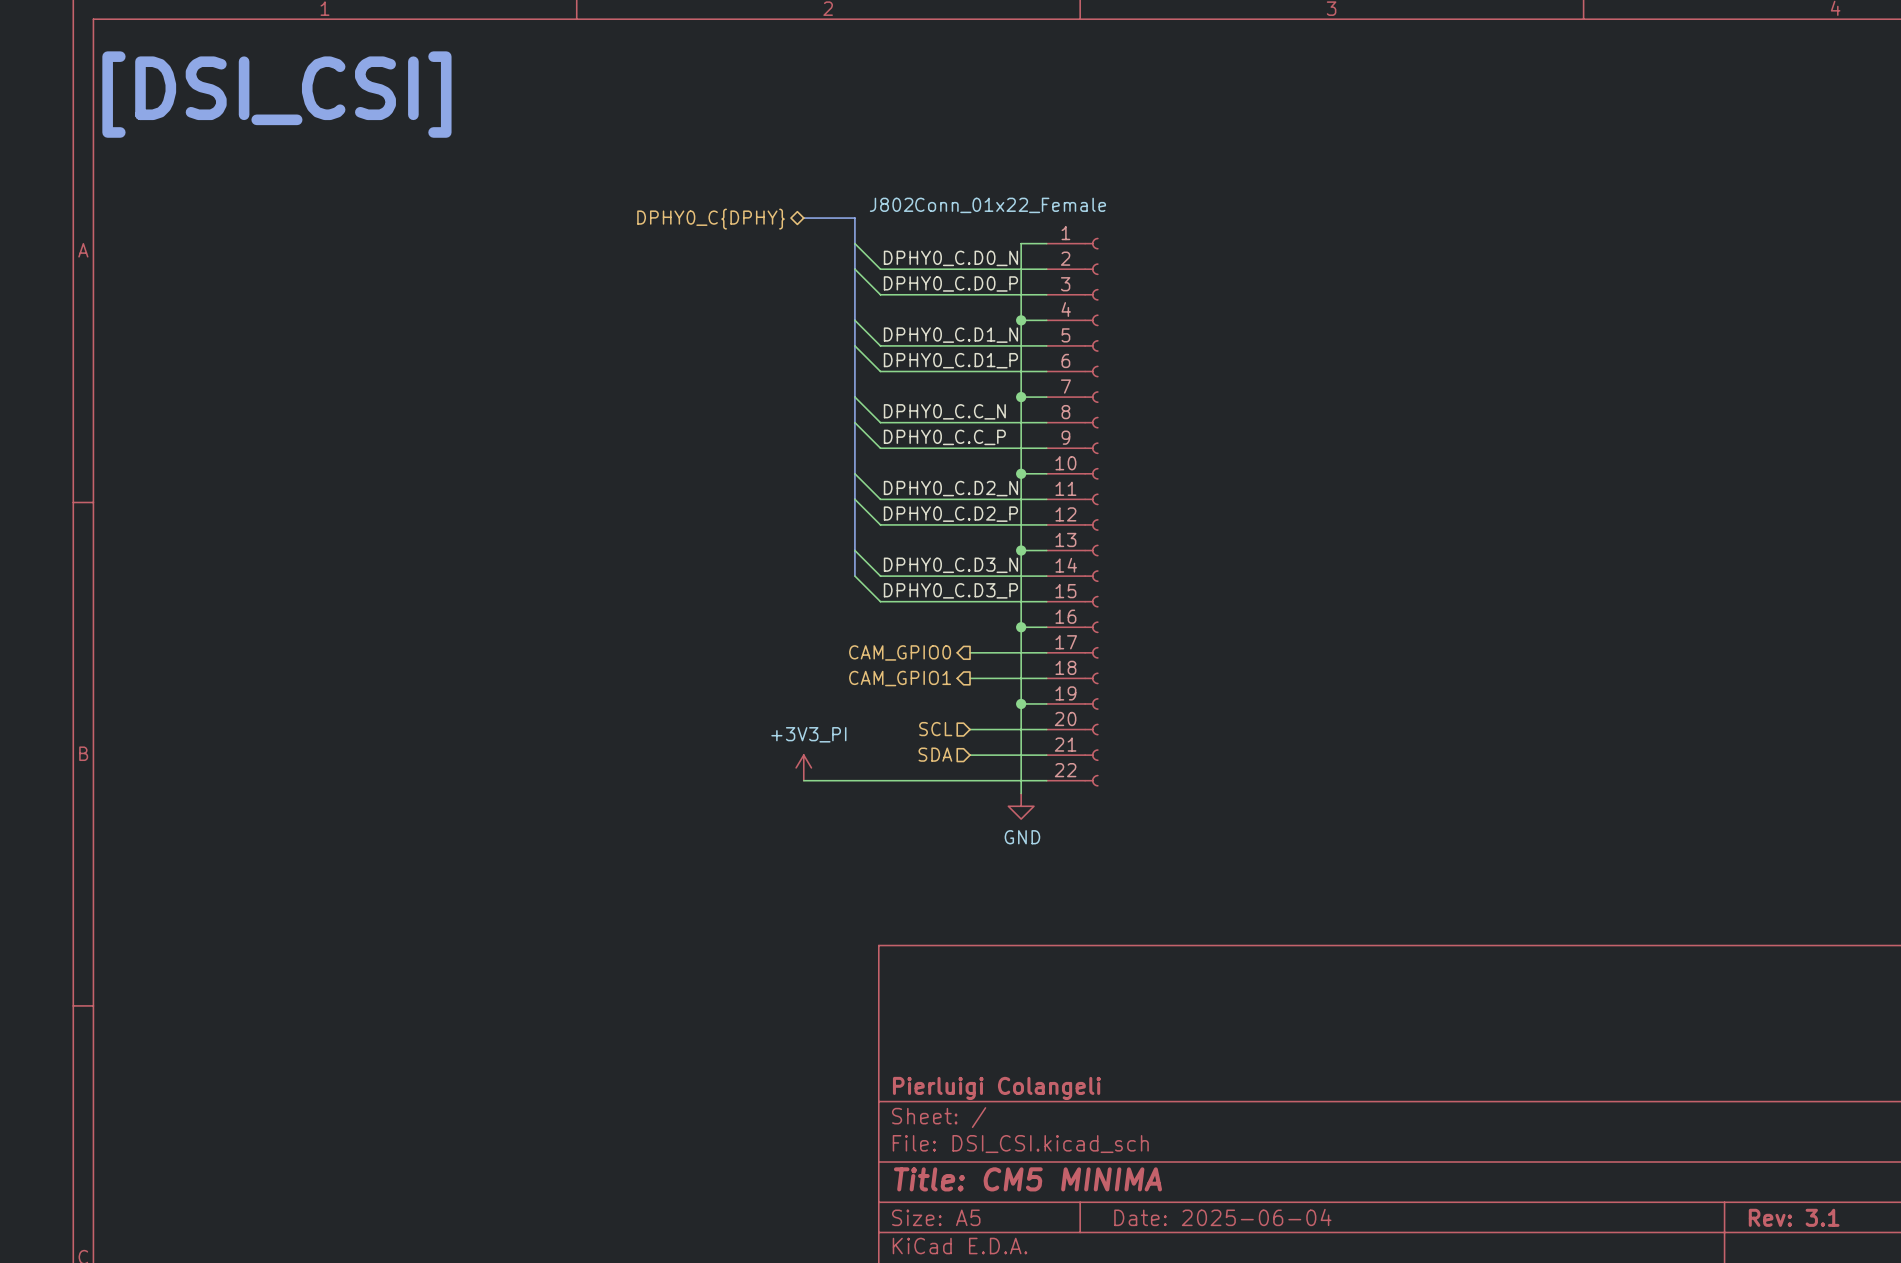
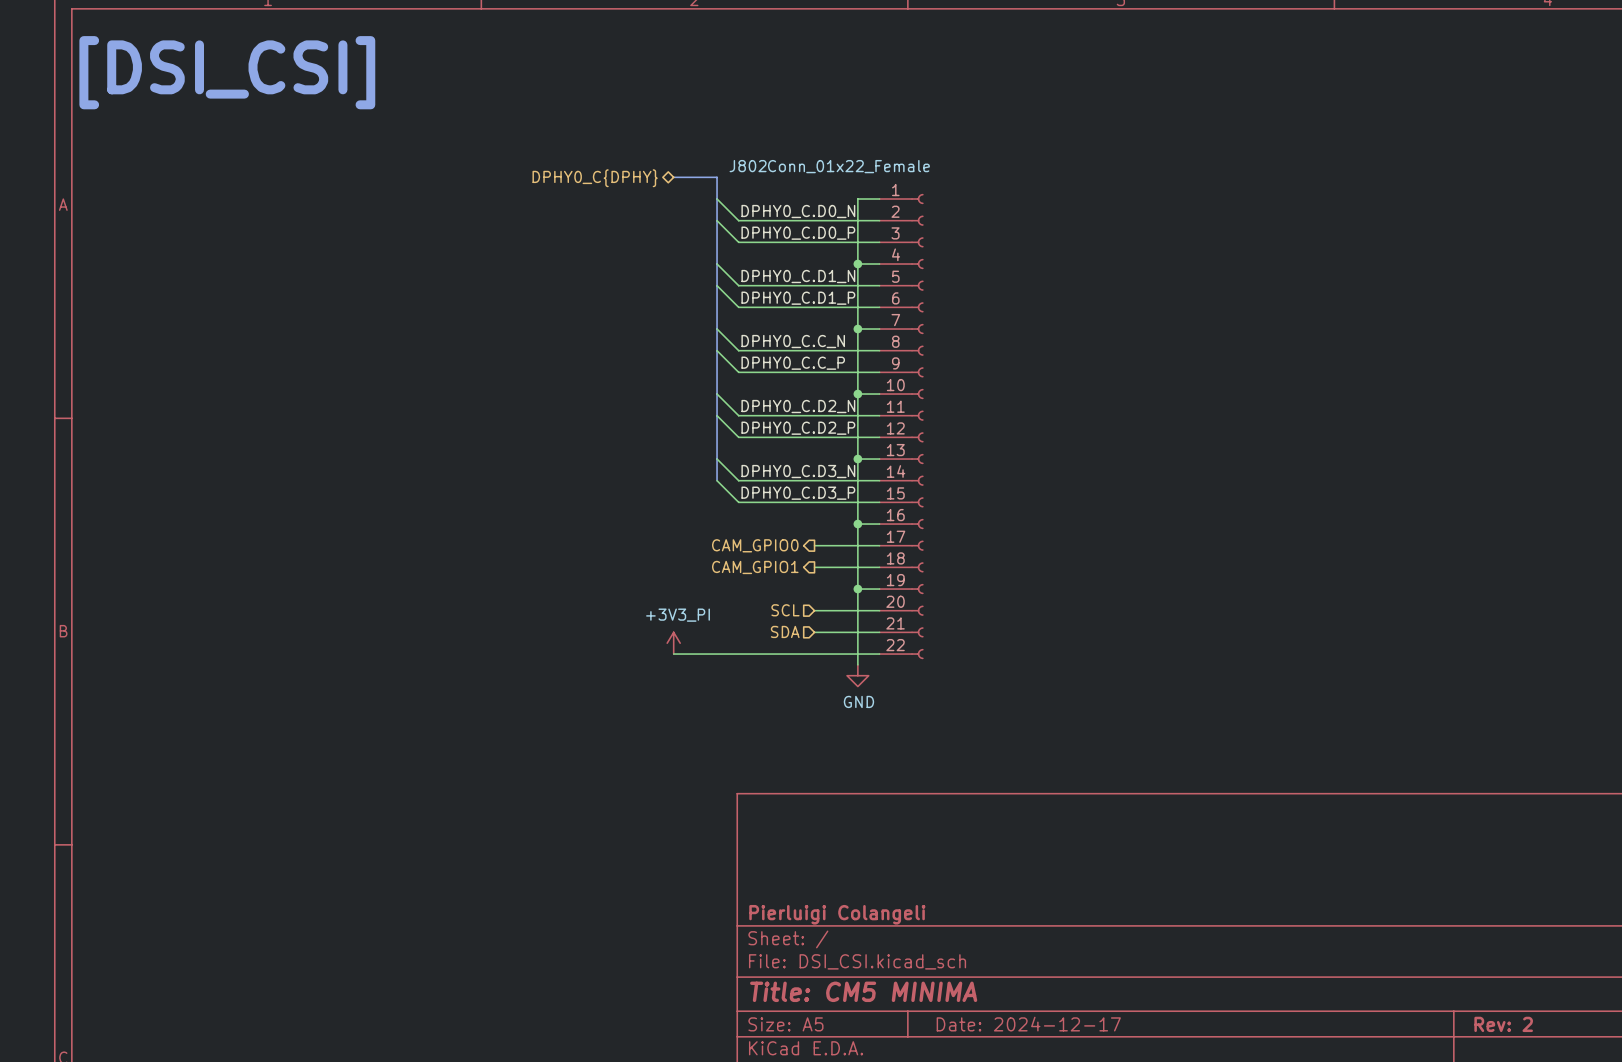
title block: Date: 2025-06-04 (1222, 1217) -> Date: 2024-12-17 (1028, 1024)
title block: Rev: 3.1 (1794, 1217) -> Rev: 2 (1503, 1024)

